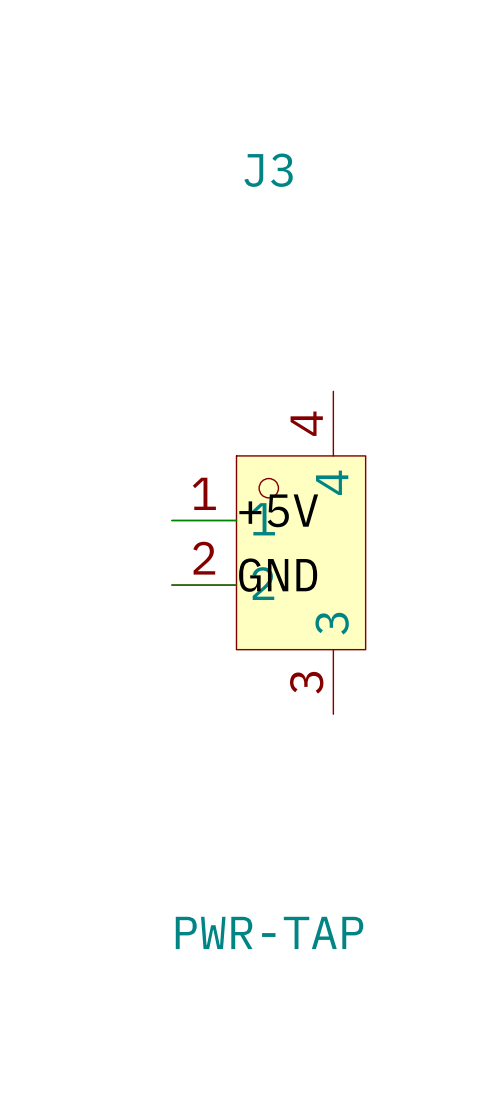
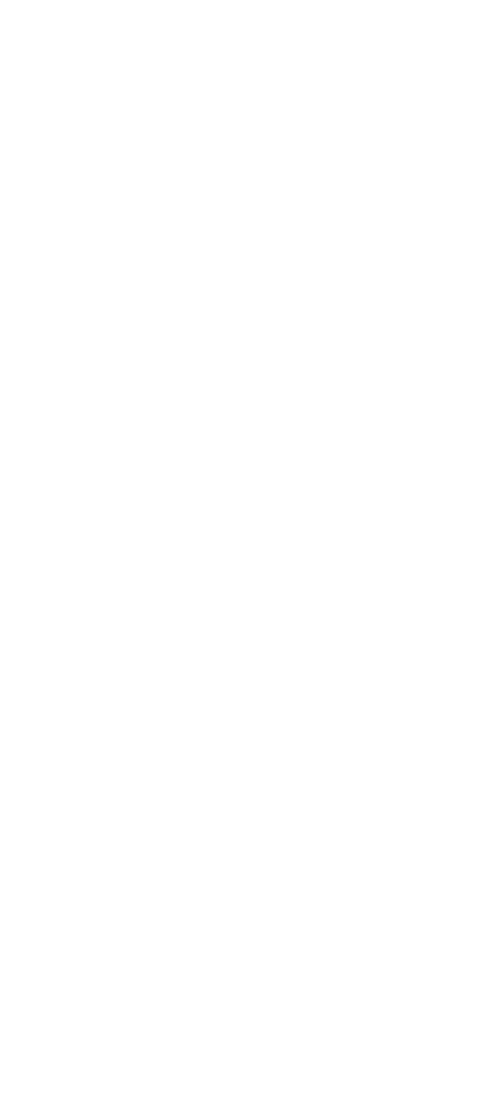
label: +5V (278, 510) -> none
wire: (171, 520) (236, 520) -> none
J3: PWR-TAP (268, 552) -> none
label: GND (278, 575) -> none
wire: (171, 585) (236, 585) -> none

